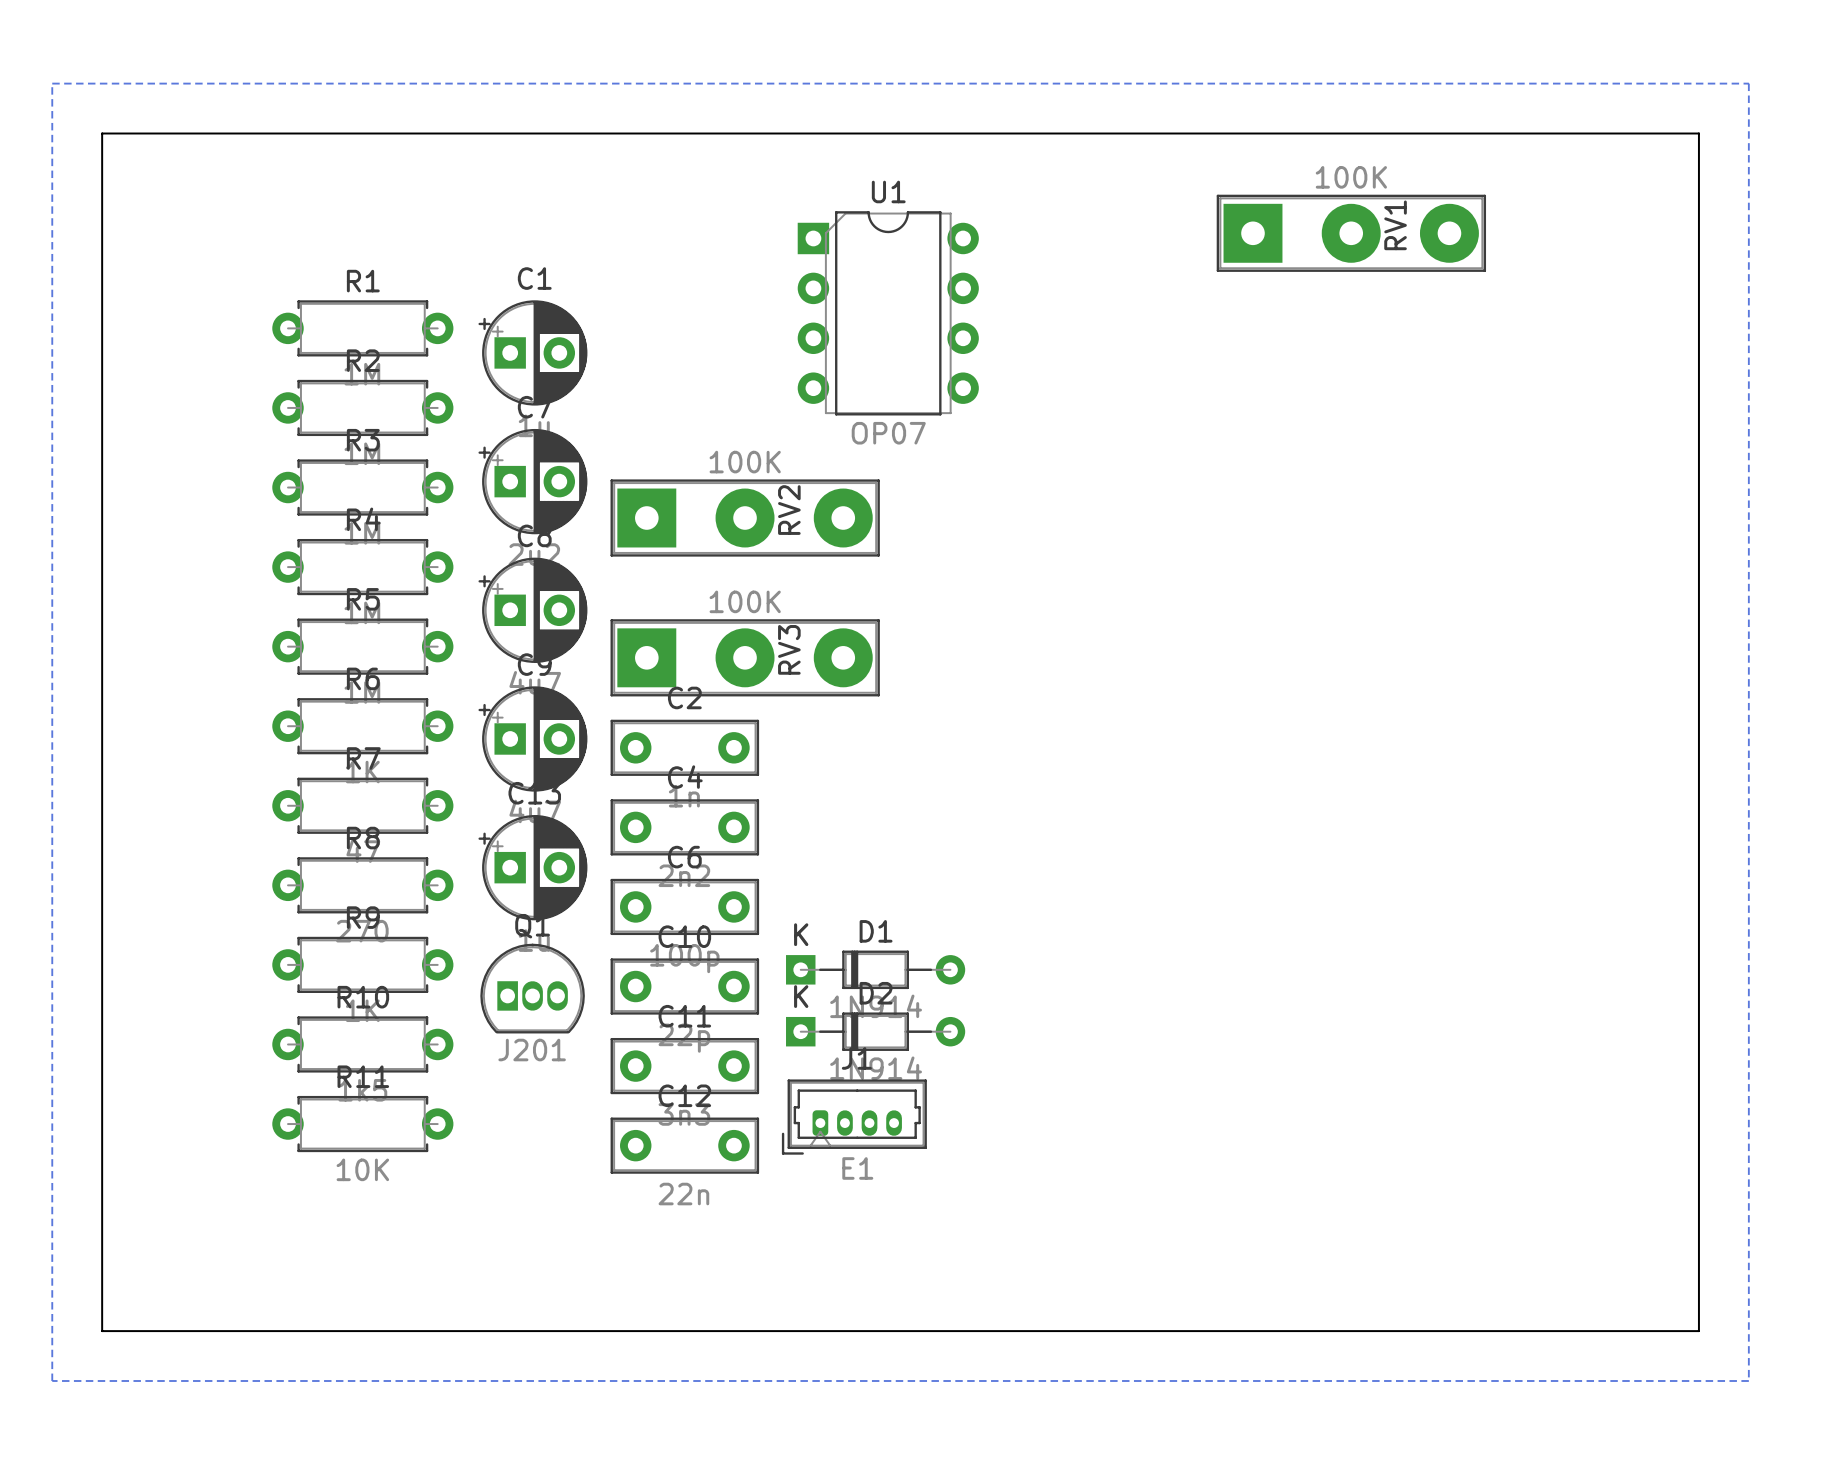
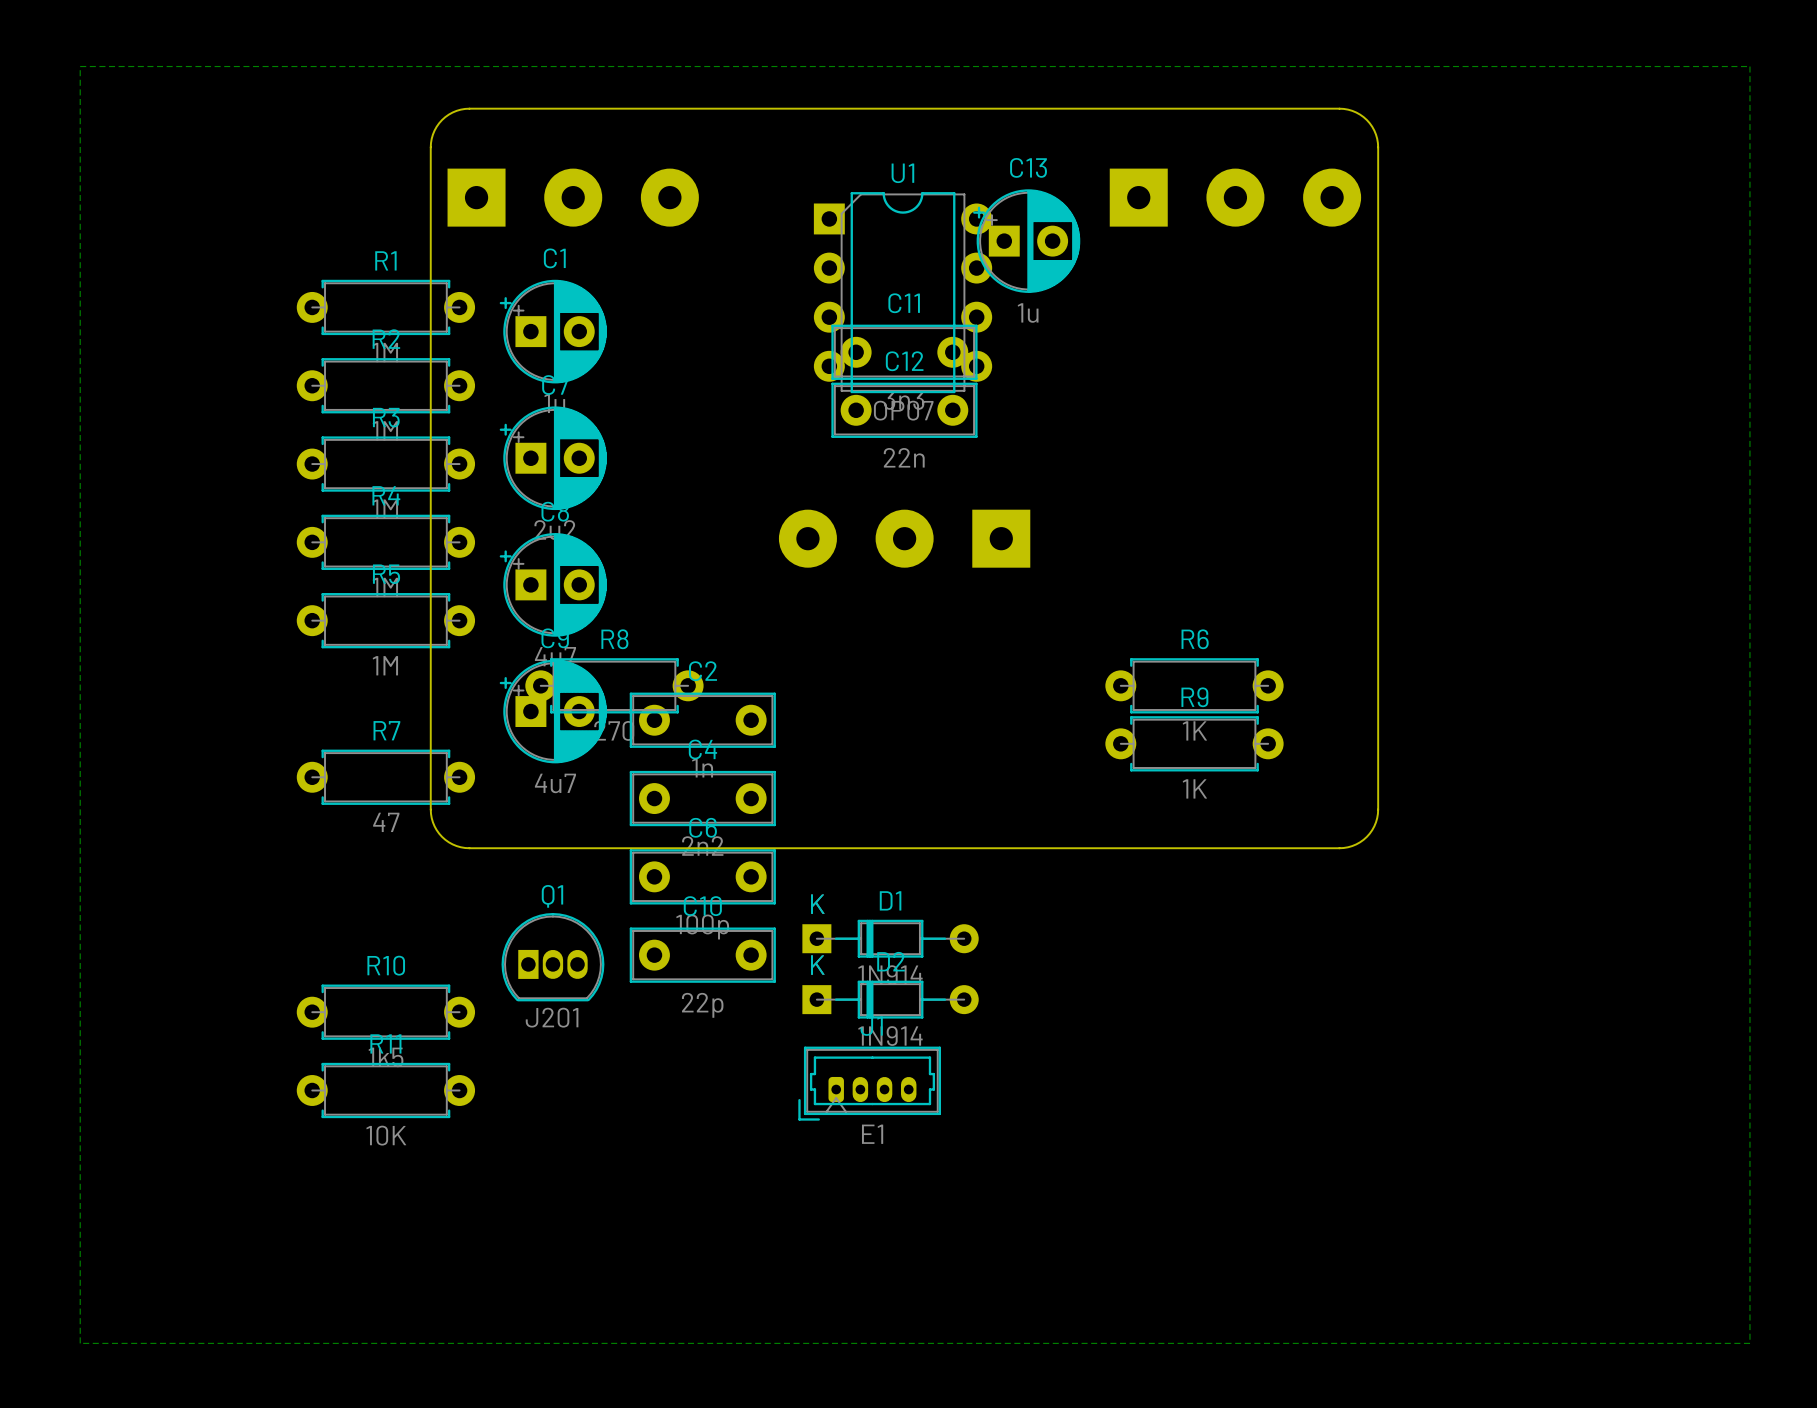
board edge: none -> (469, 108) (1339, 108) (1352, 110) (1363, 117) (1374, 130) (1378, 147) (1378, 809) (1376, 822) (1369, 833) (1356, 844) (1339, 848) (469, 848) (456, 846) (445, 839) (434, 826) (430, 809) (430, 147) (432, 134) (442, 120) (456, 110) (469, 108)
board edge: (102, 133) (1698, 133) (1698, 1331) (102, 1331) (102, 133) -> none
part: none -> (1235, 197)
RV1: 100K (1351, 233) -> none
RV2: 100K (745, 518) -> none
part: none -> (904, 538)
RV3 side: top (745, 657) -> bottom (573, 197)
R6 position: (362, 726) -> (1194, 685)
C13 position: (532, 867) -> (1026, 241)
R8 position: (362, 885) -> (614, 685)
R9 position: (362, 964) -> (1194, 743)
C11 position: (684, 1066) -> (904, 352)
C12 position: (684, 1145) -> (904, 410)

